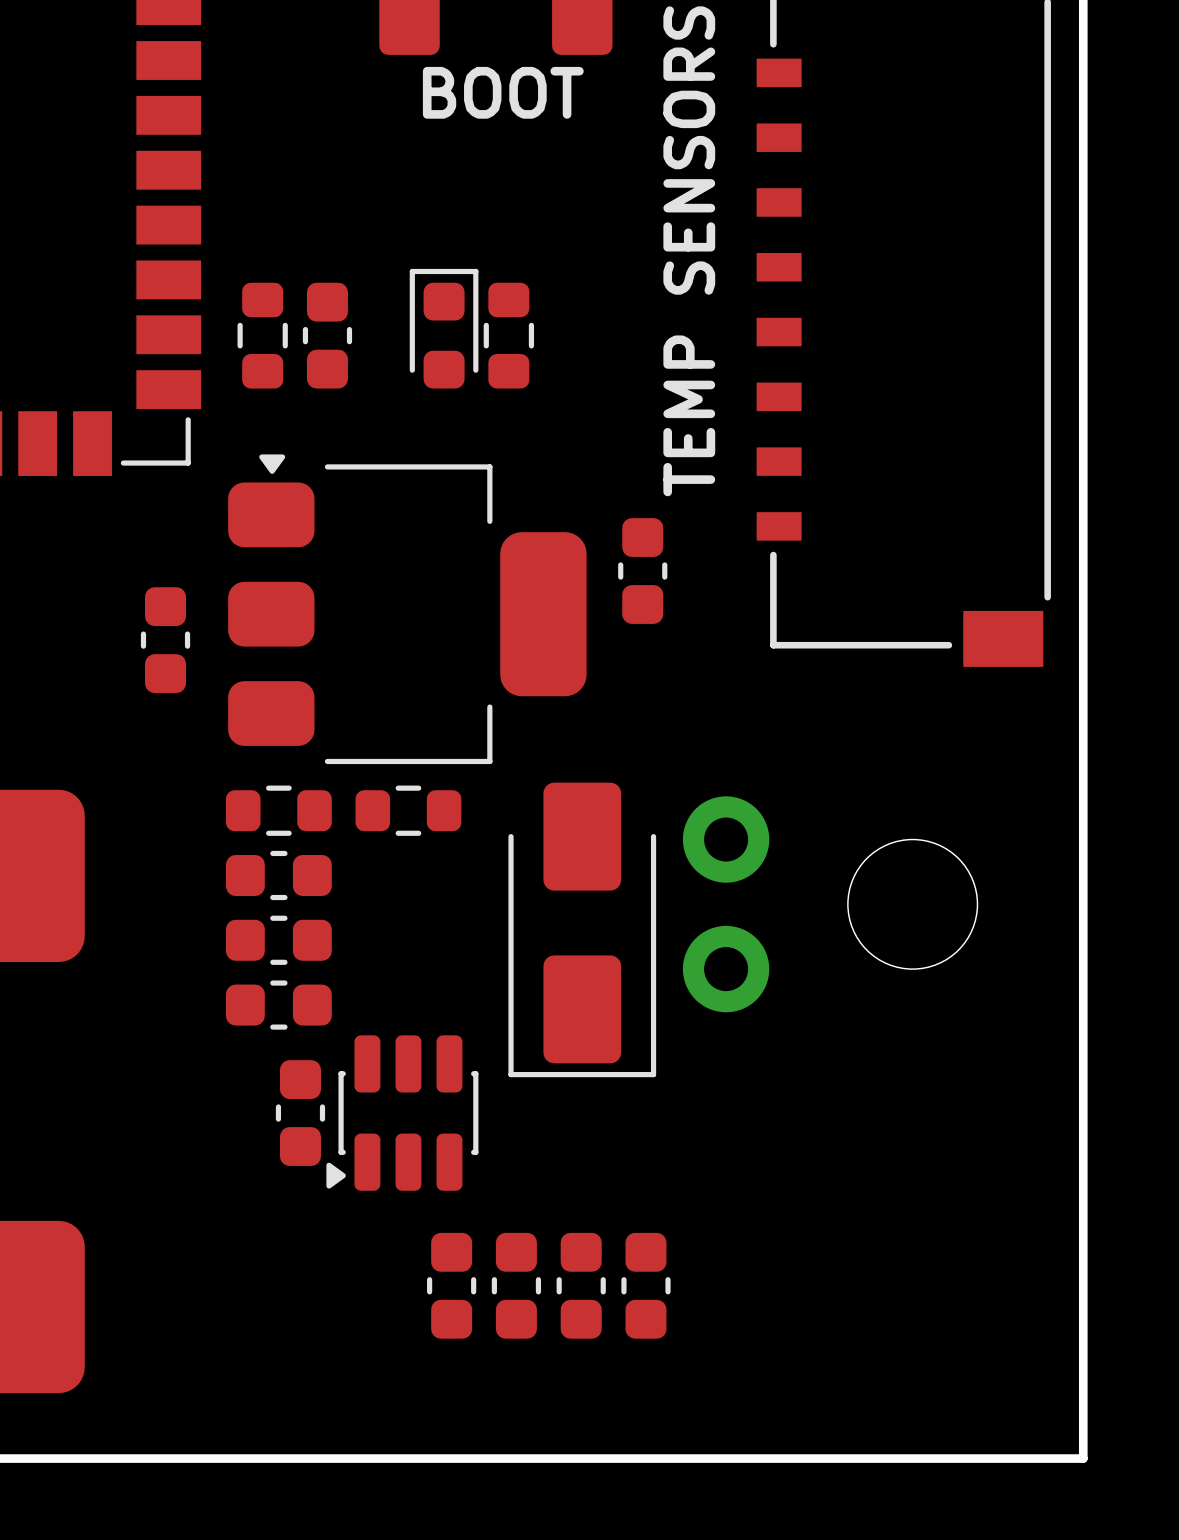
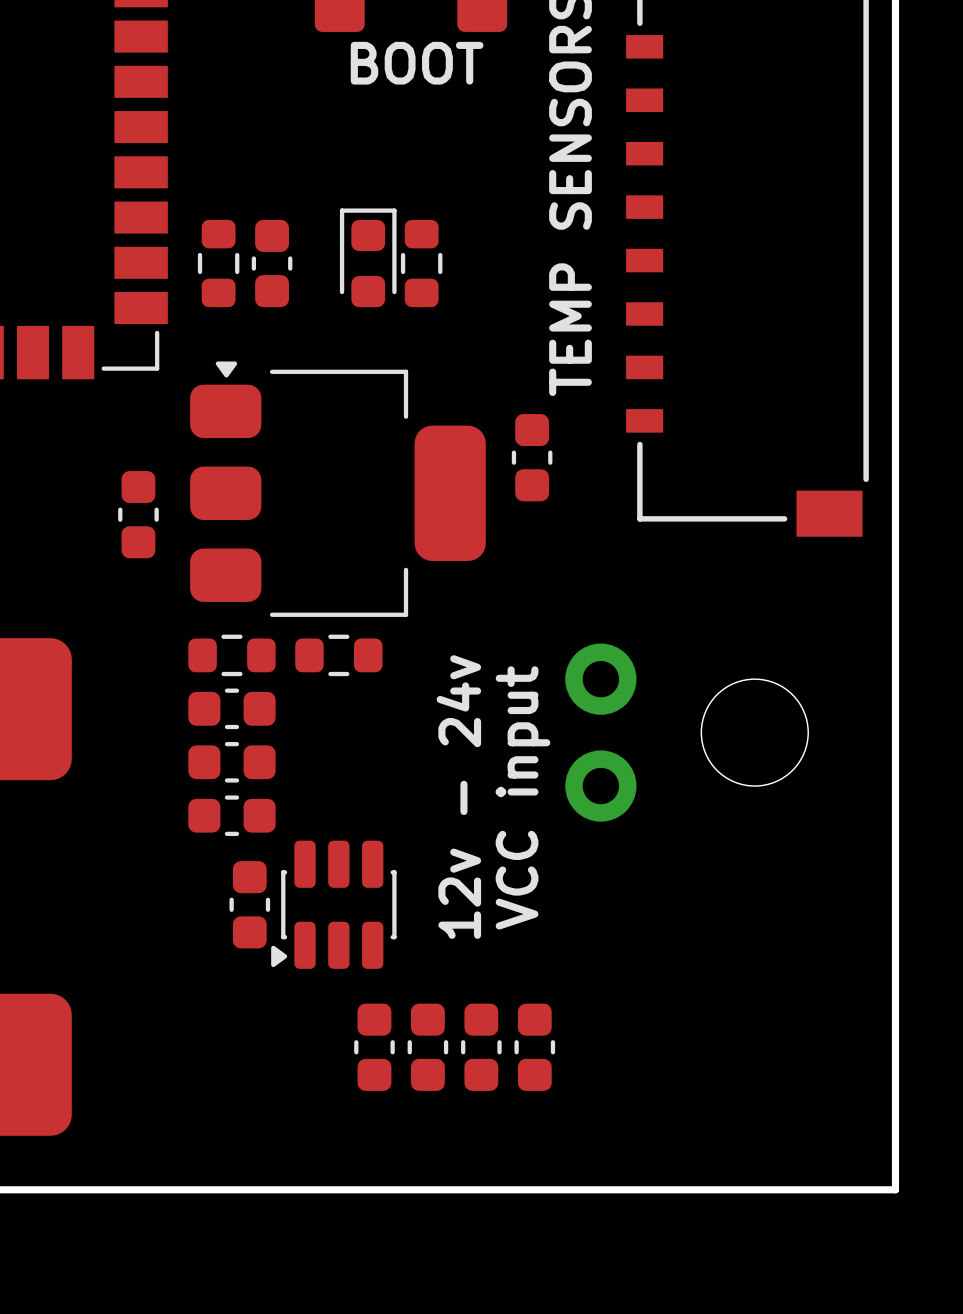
part: (582, 929) -> none
text: none -> 12v - 24v (458, 797)
text: none -> VCC input (523, 797)

